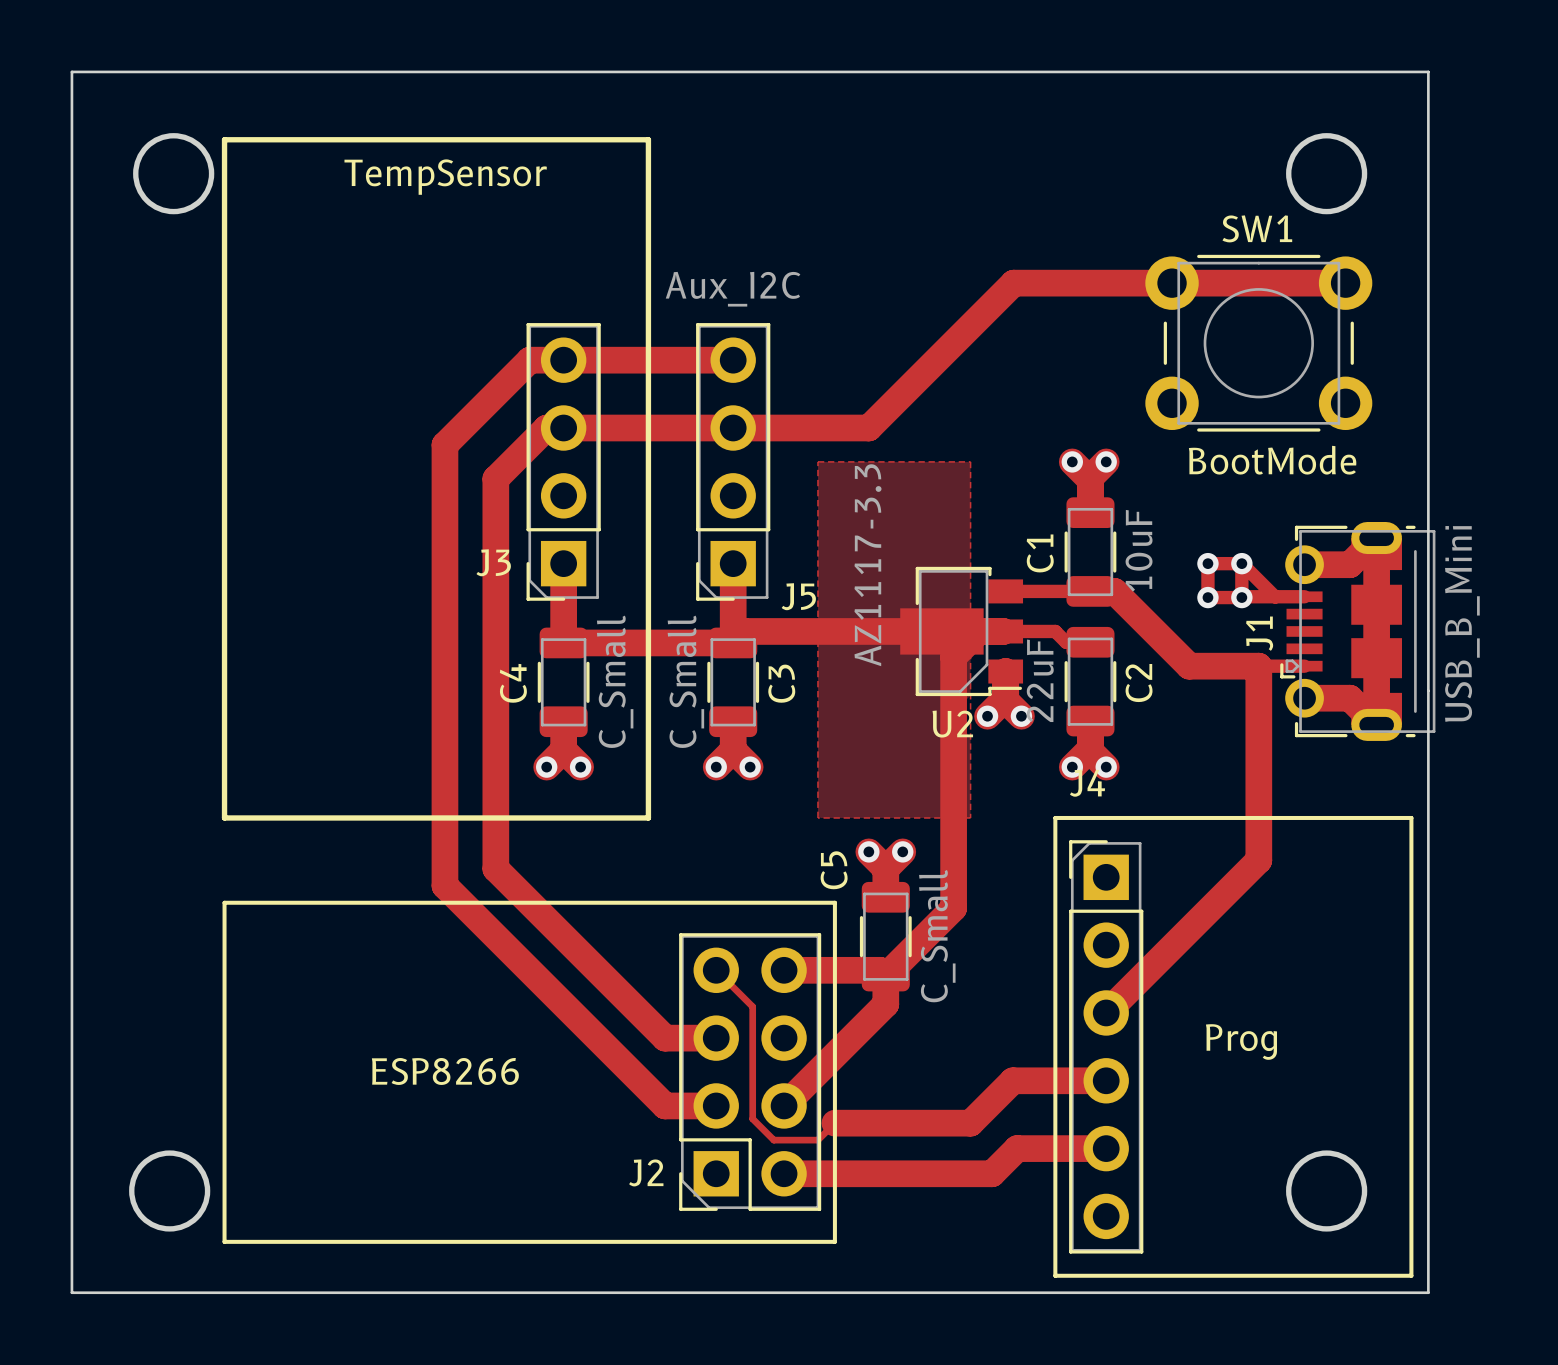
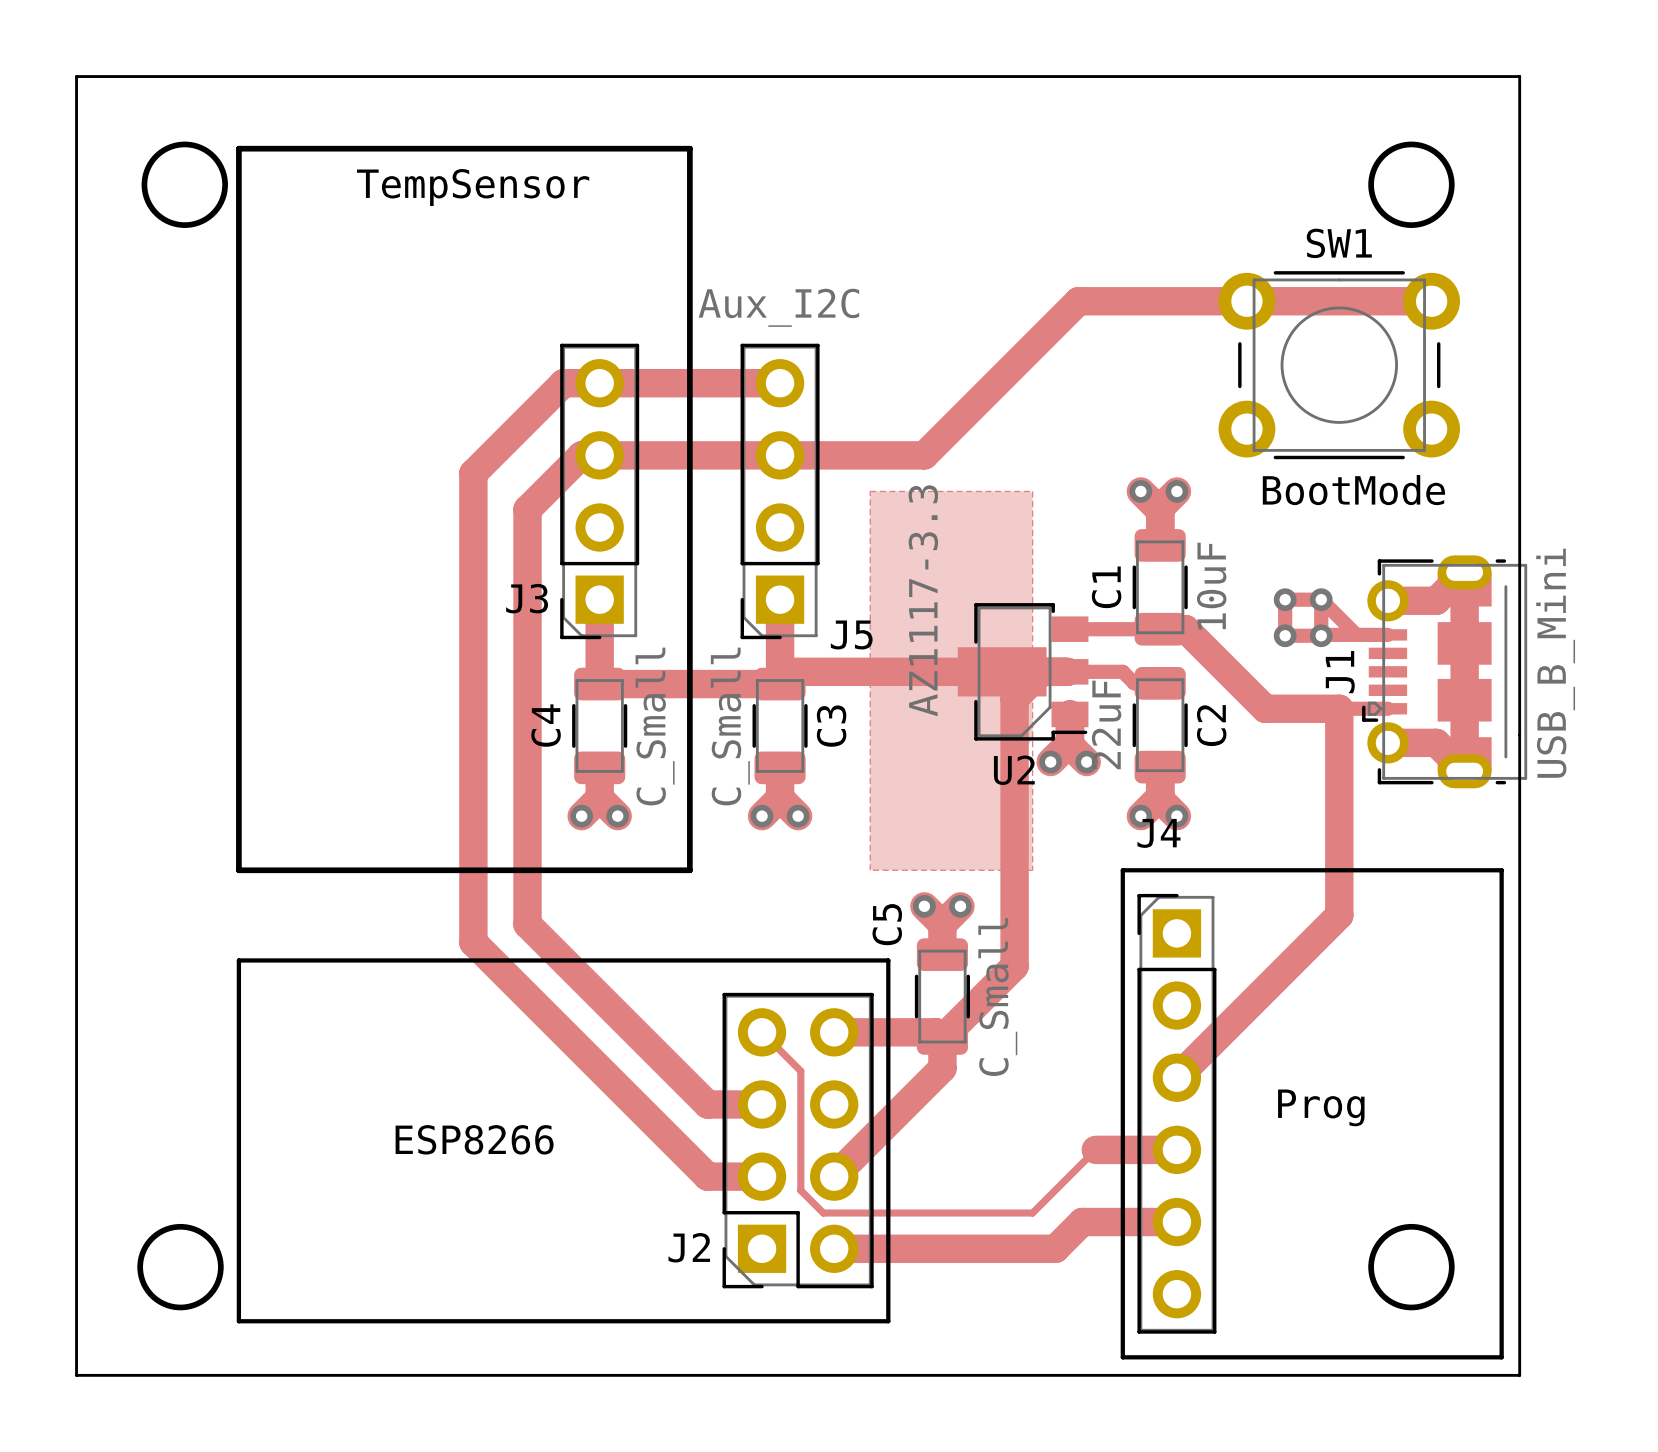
track: (1029, 1080) (1012, 1080) (970, 1123) (834, 1123) (817, 1140) -> (1095, 1149) (1032, 1213) (870, 1213)

